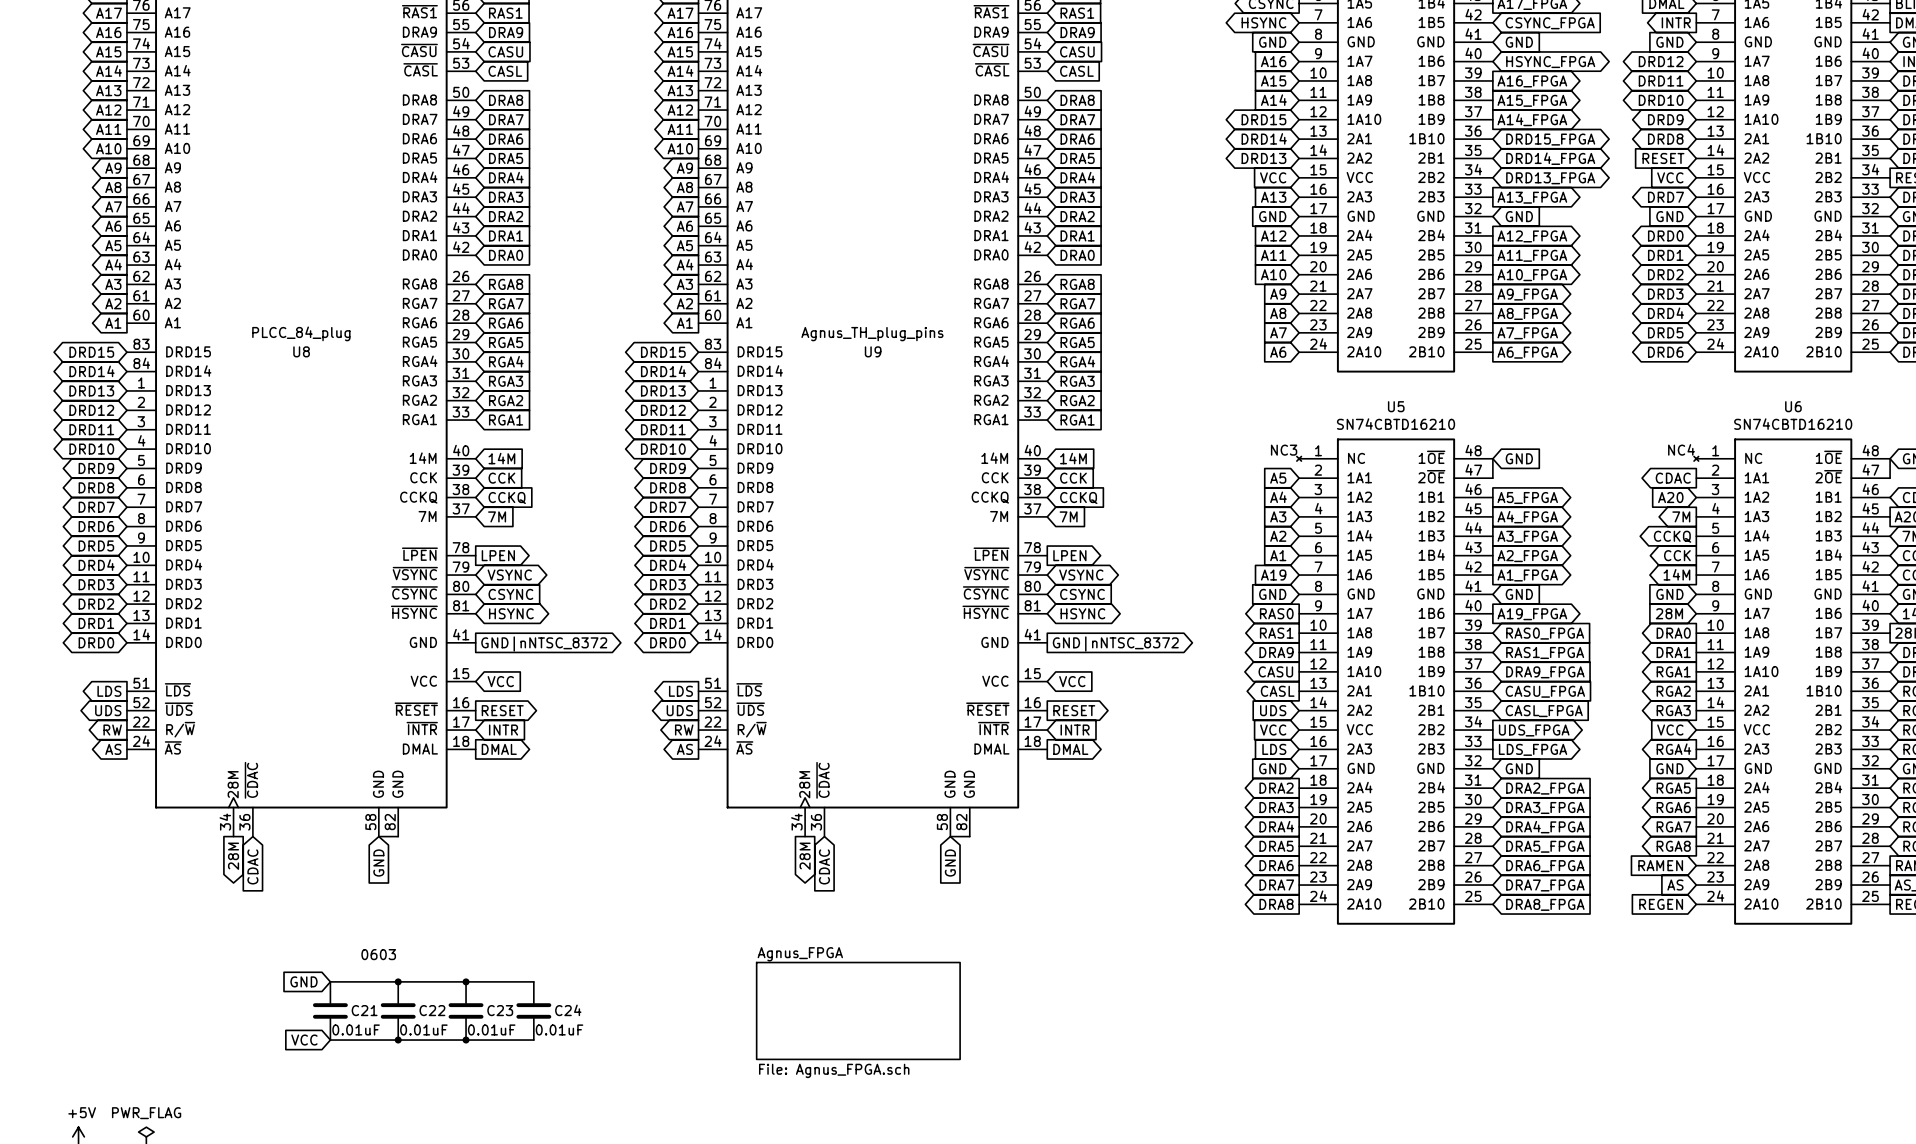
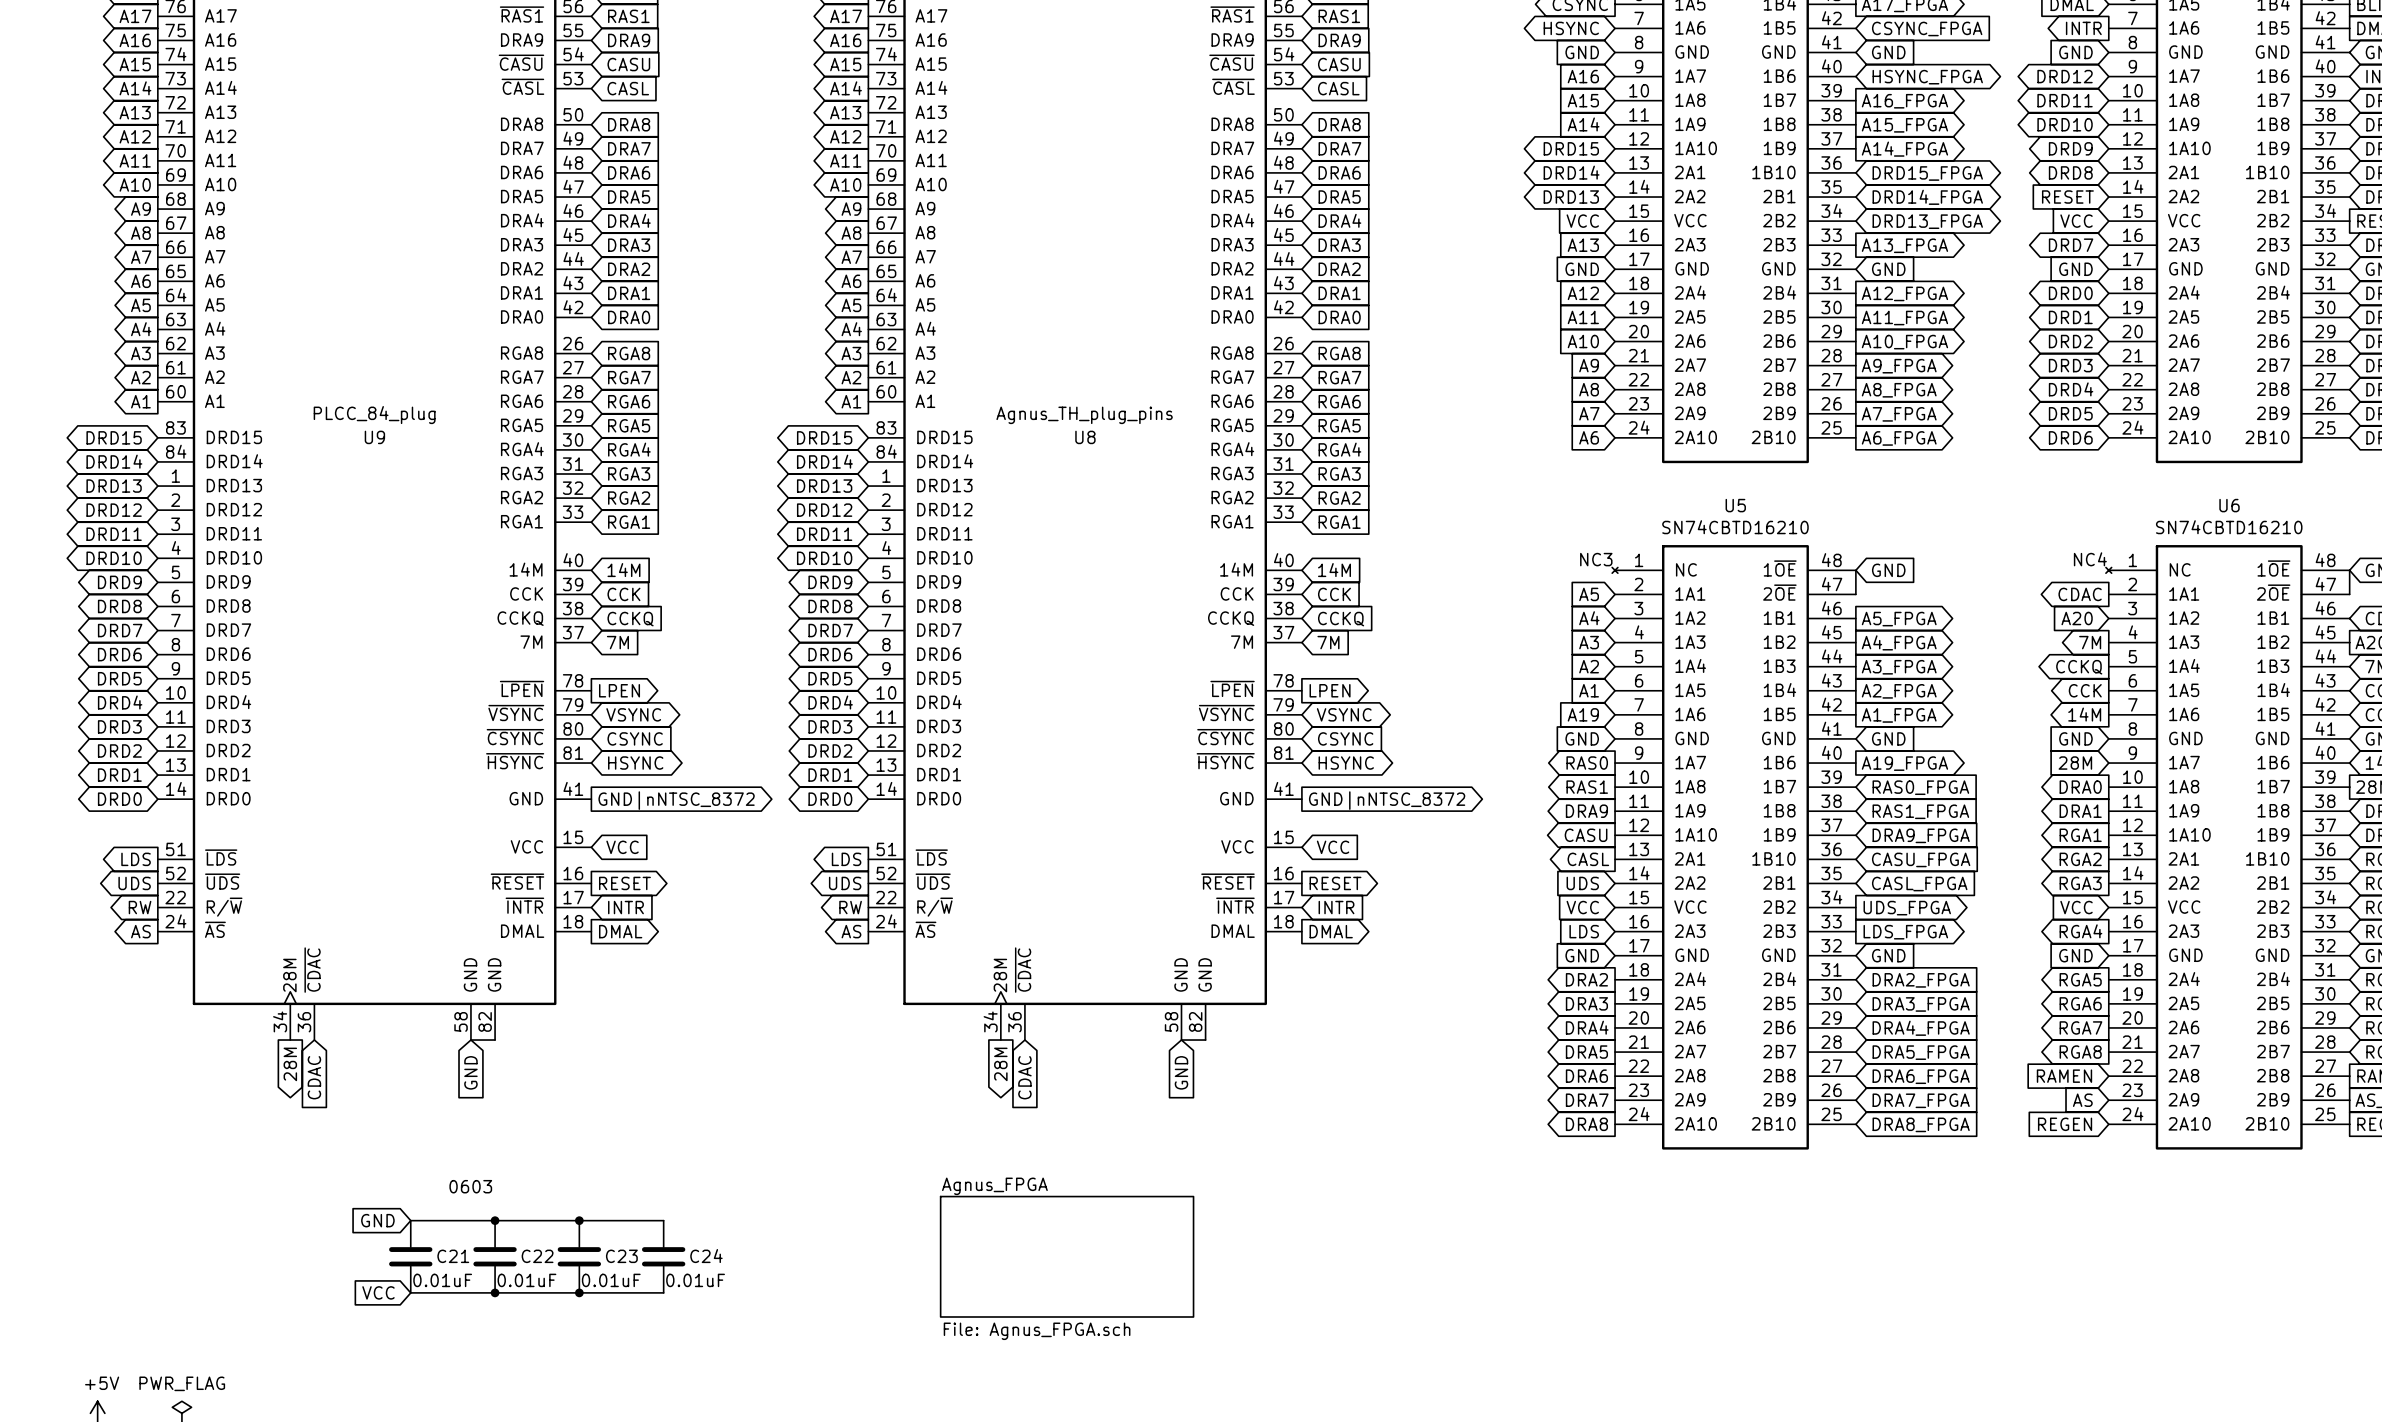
U8 name: U8 (301, 351) -> U9 (374, 437)
U9 name: U9 (873, 351) -> U8 (1085, 437)

